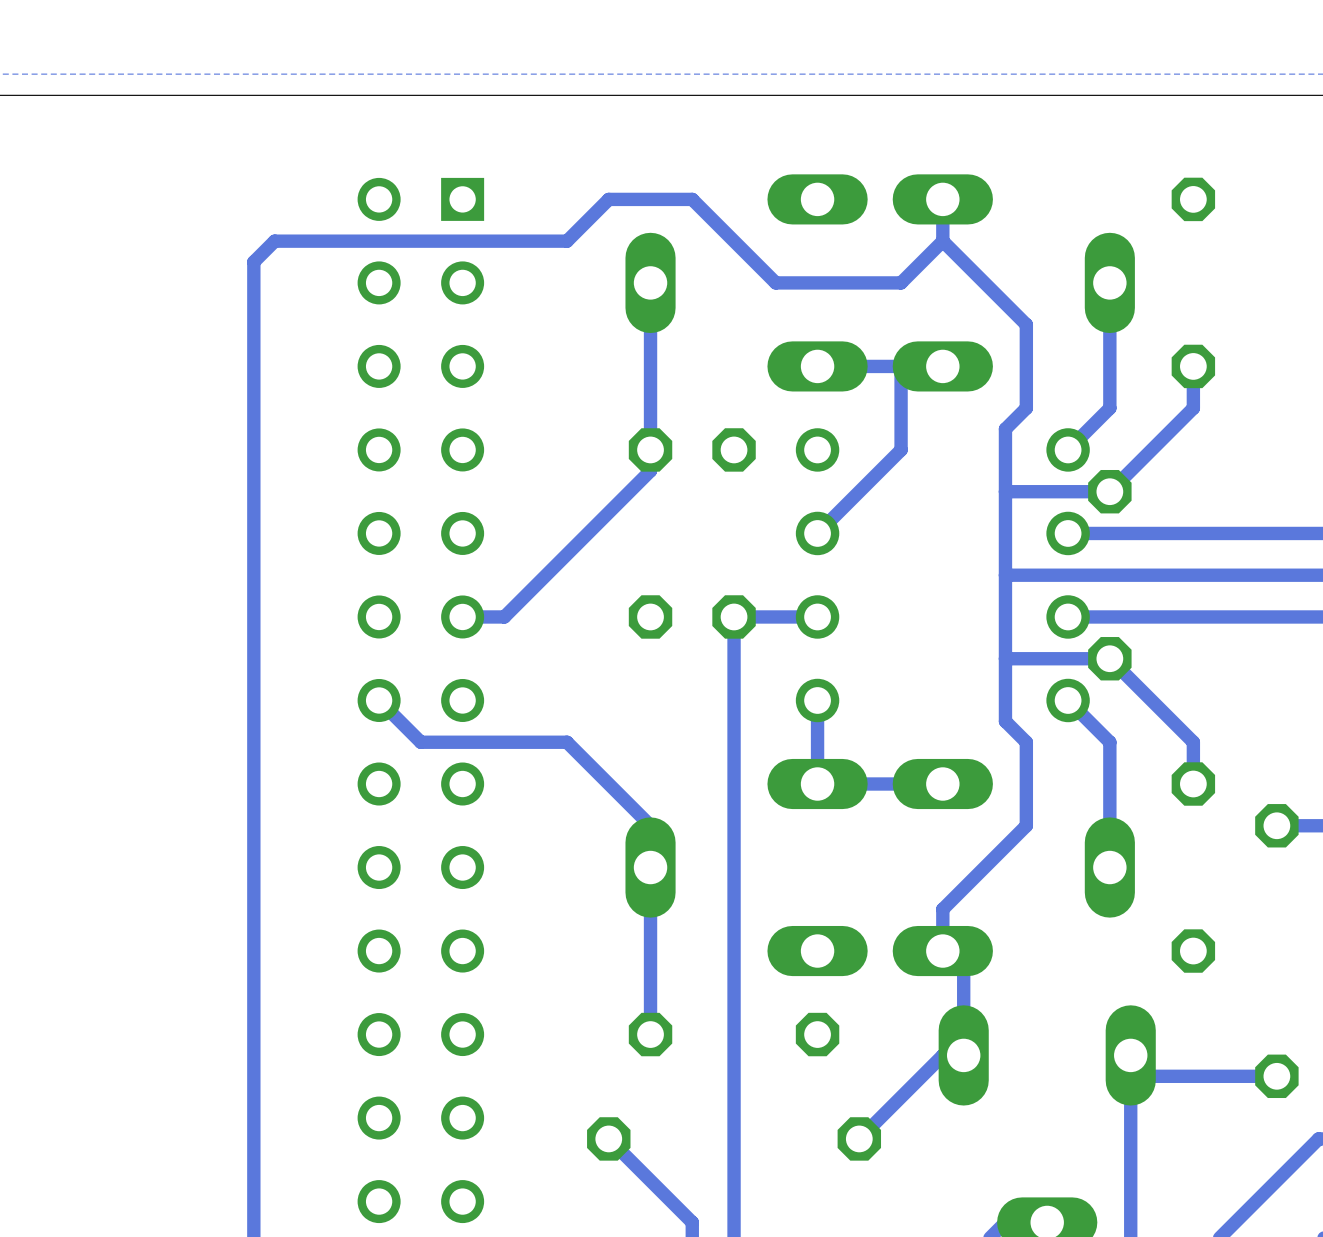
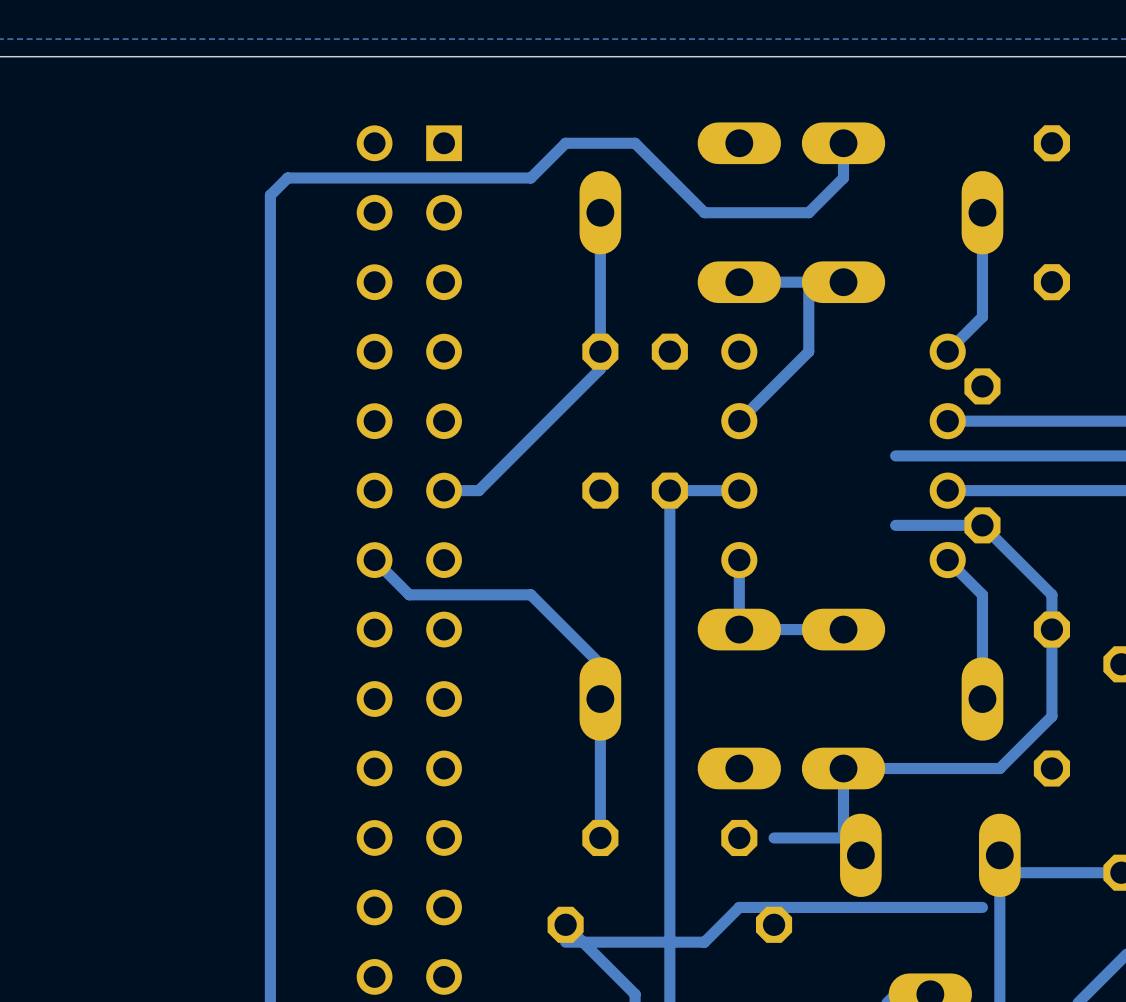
bottom track: (942, 241) (1026, 324) (1026, 408) (1005, 429) (1005, 721) (1026, 742) (1026, 825) (942, 909) (942, 951) (963, 971) (963, 1055) (942, 1055) (859, 1138) -> none
bottom track: (1193, 366) (1193, 408) (1109, 491) (1005, 491) -> none
bottom track: none -> (1051, 629) (1051, 716) (999, 768) (843, 768) (843, 837) (774, 837)
bottom track: none -> (982, 907) (739, 907) (704, 942) (565, 942)

